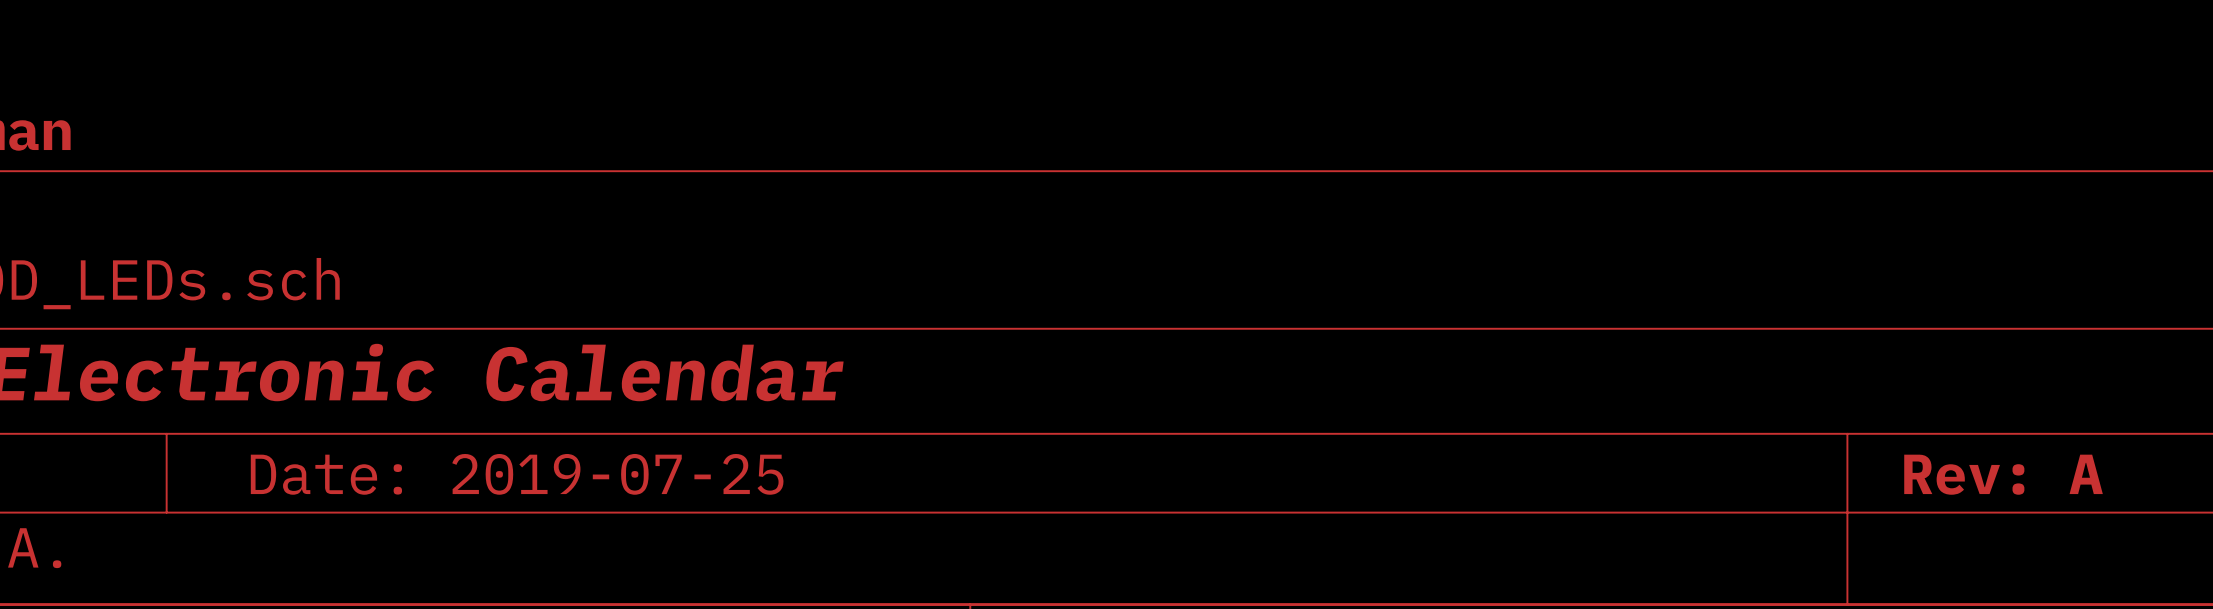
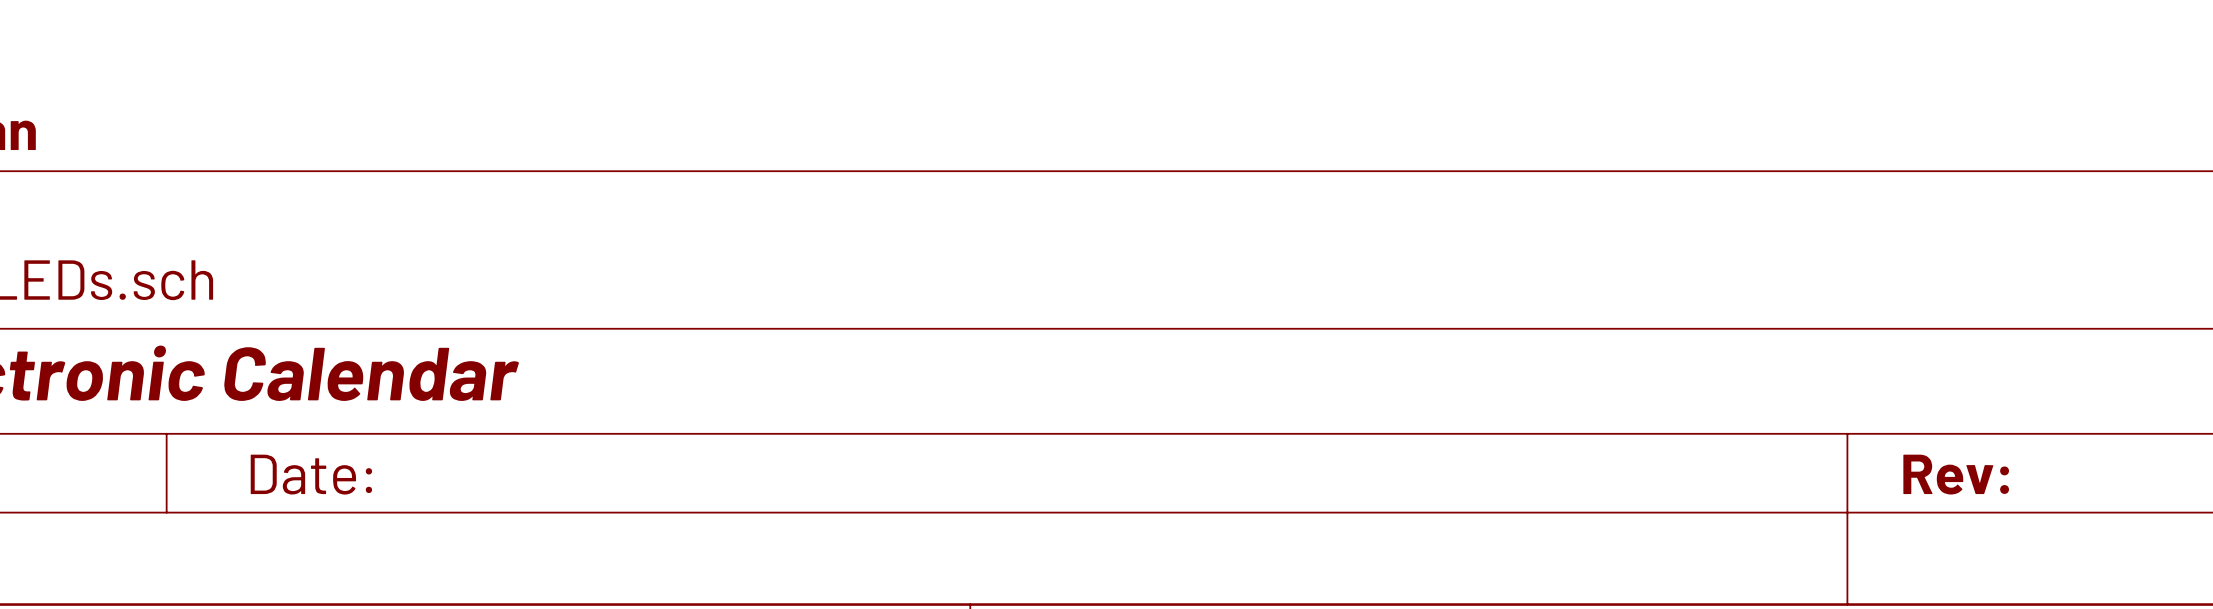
title block: Date: 2019-07-25 (517, 474) -> Date: (311, 474)
title block: Rev: A (2003, 474) -> Rev: (1956, 474)

